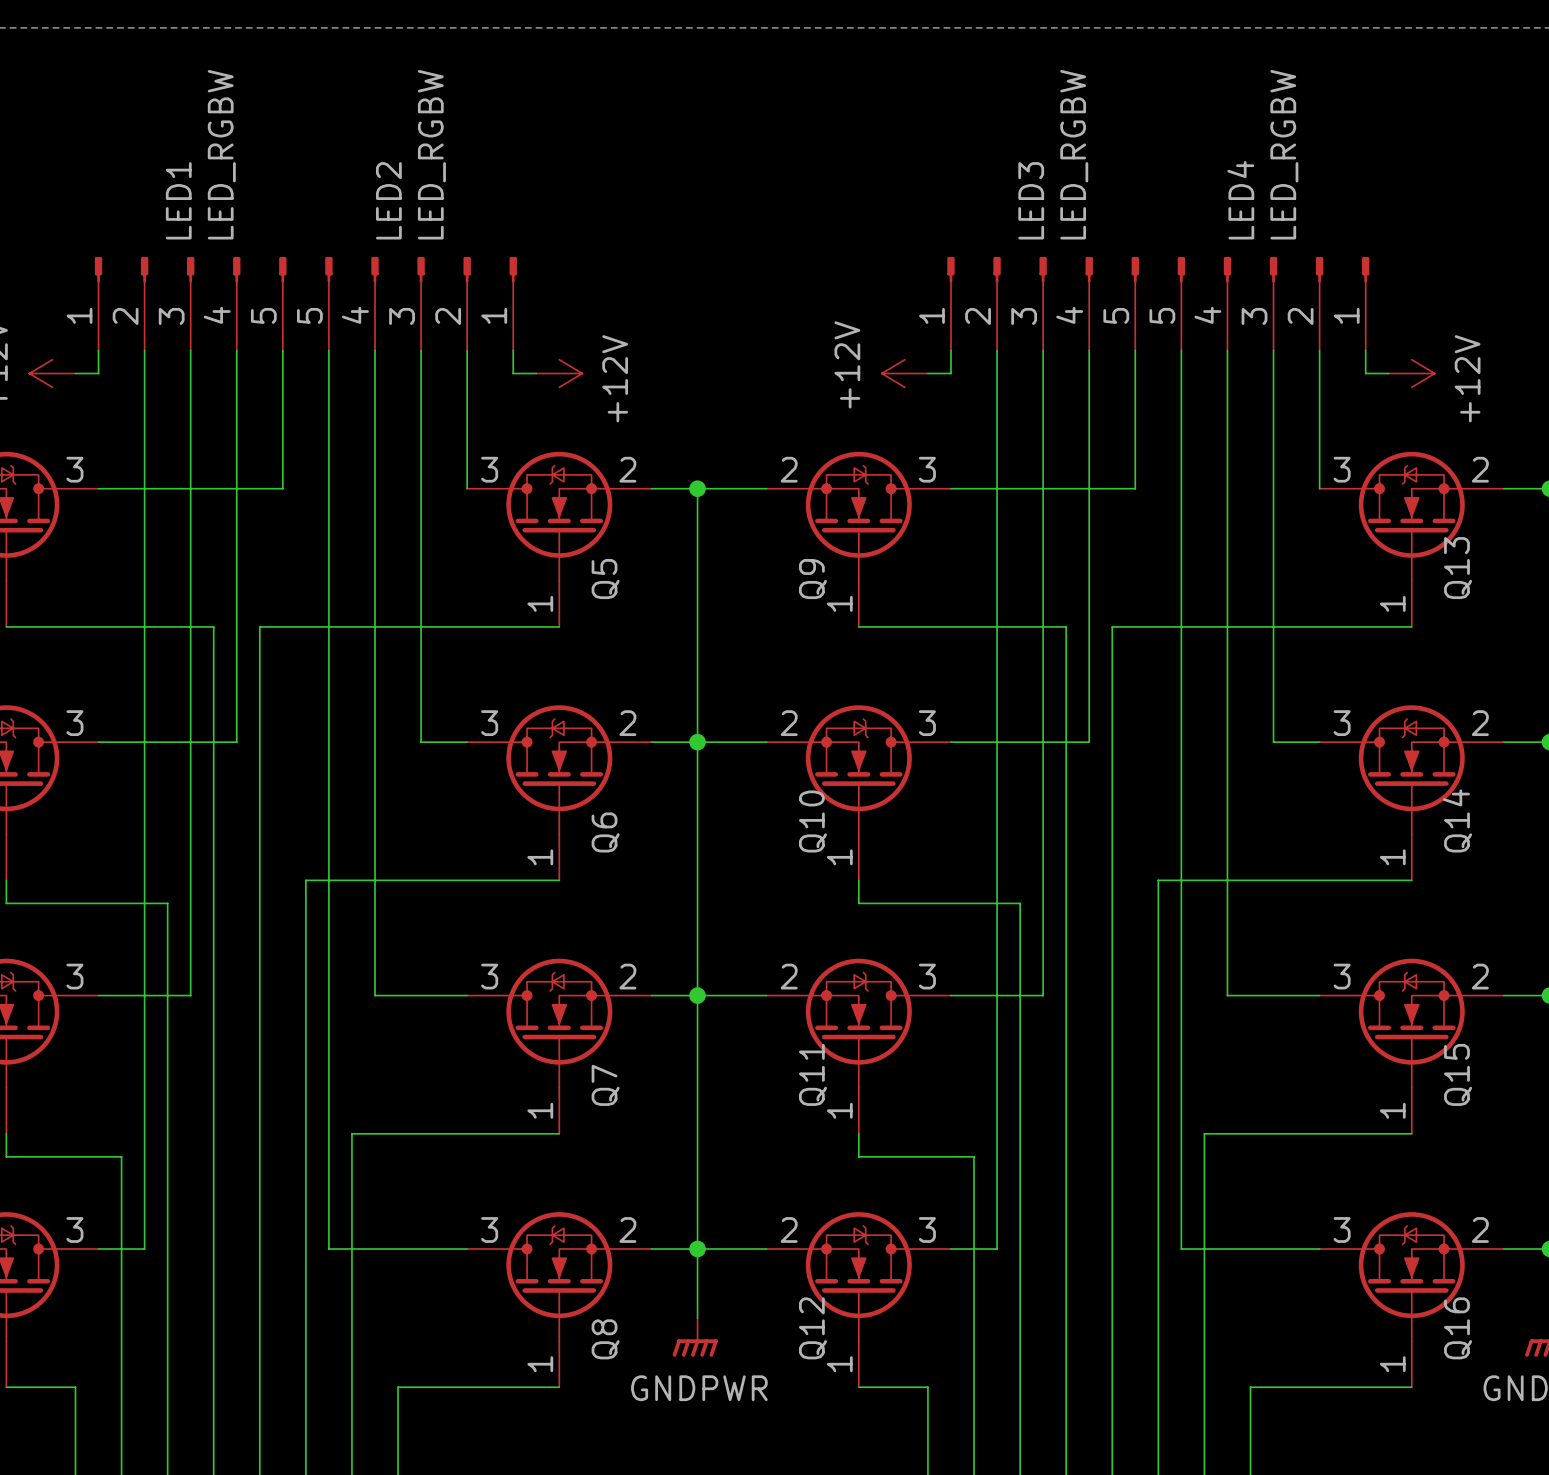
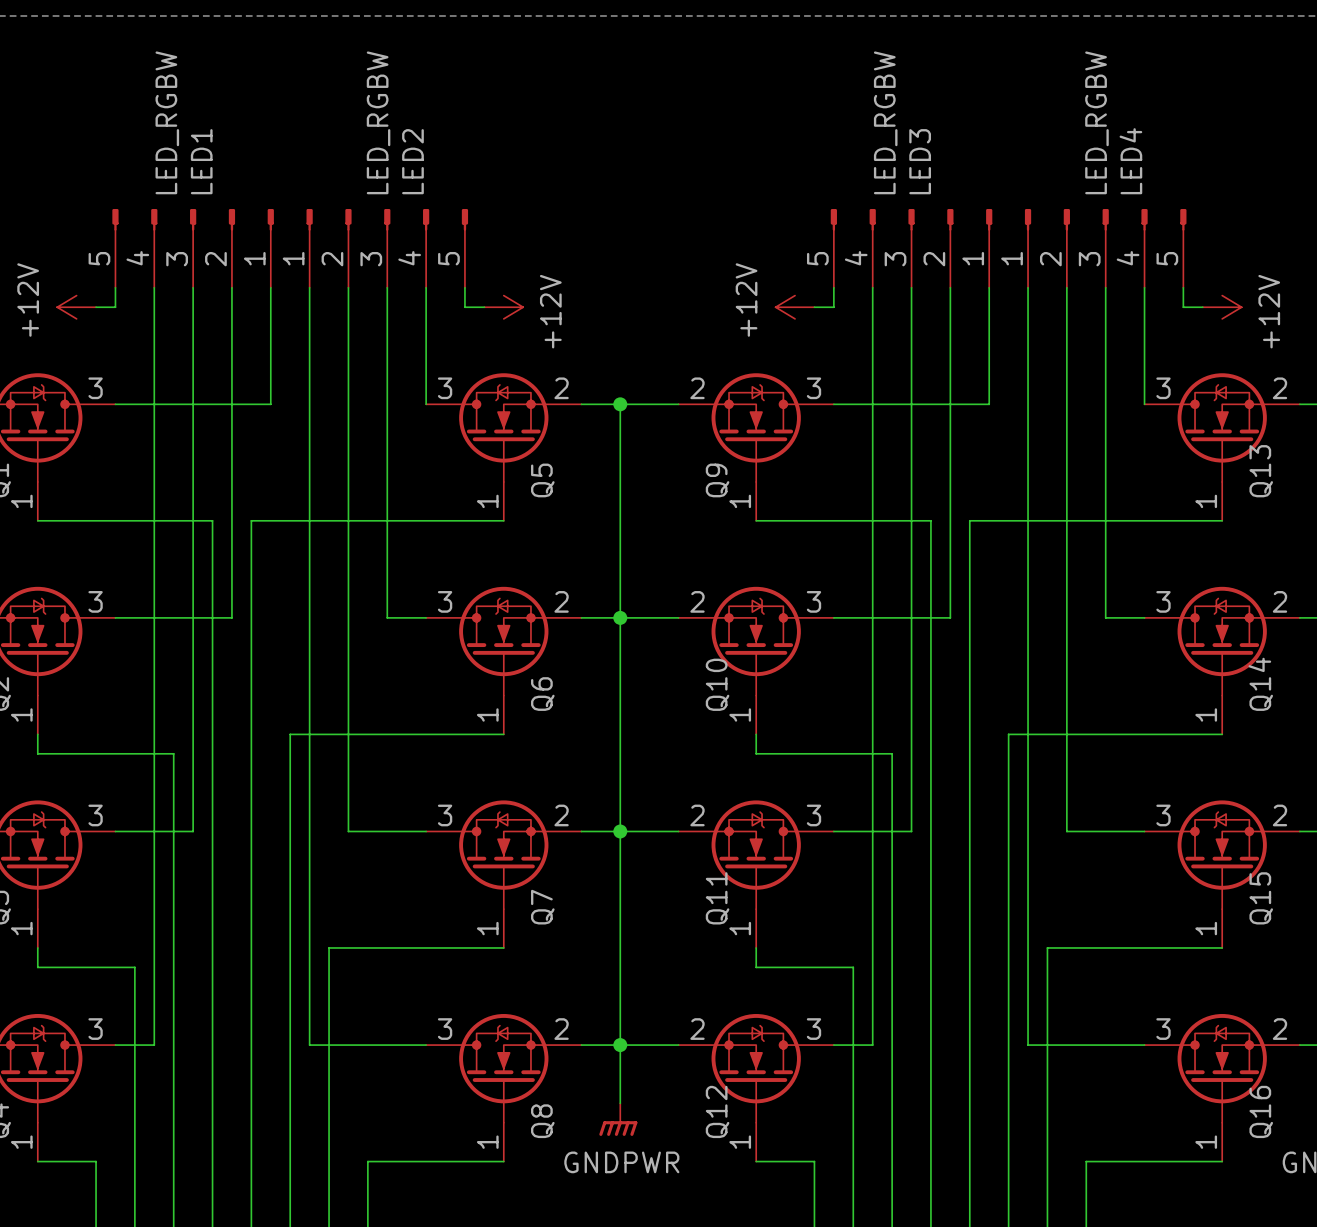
LED1 flip: as is (190, 269) -> left-right (193, 219)
LED2 flip: as is (421, 269) -> left-right (387, 219)
LED3 flip: as is (1043, 269) -> left-right (911, 219)
LED4 flip: as is (1273, 269) -> left-right (1105, 219)

